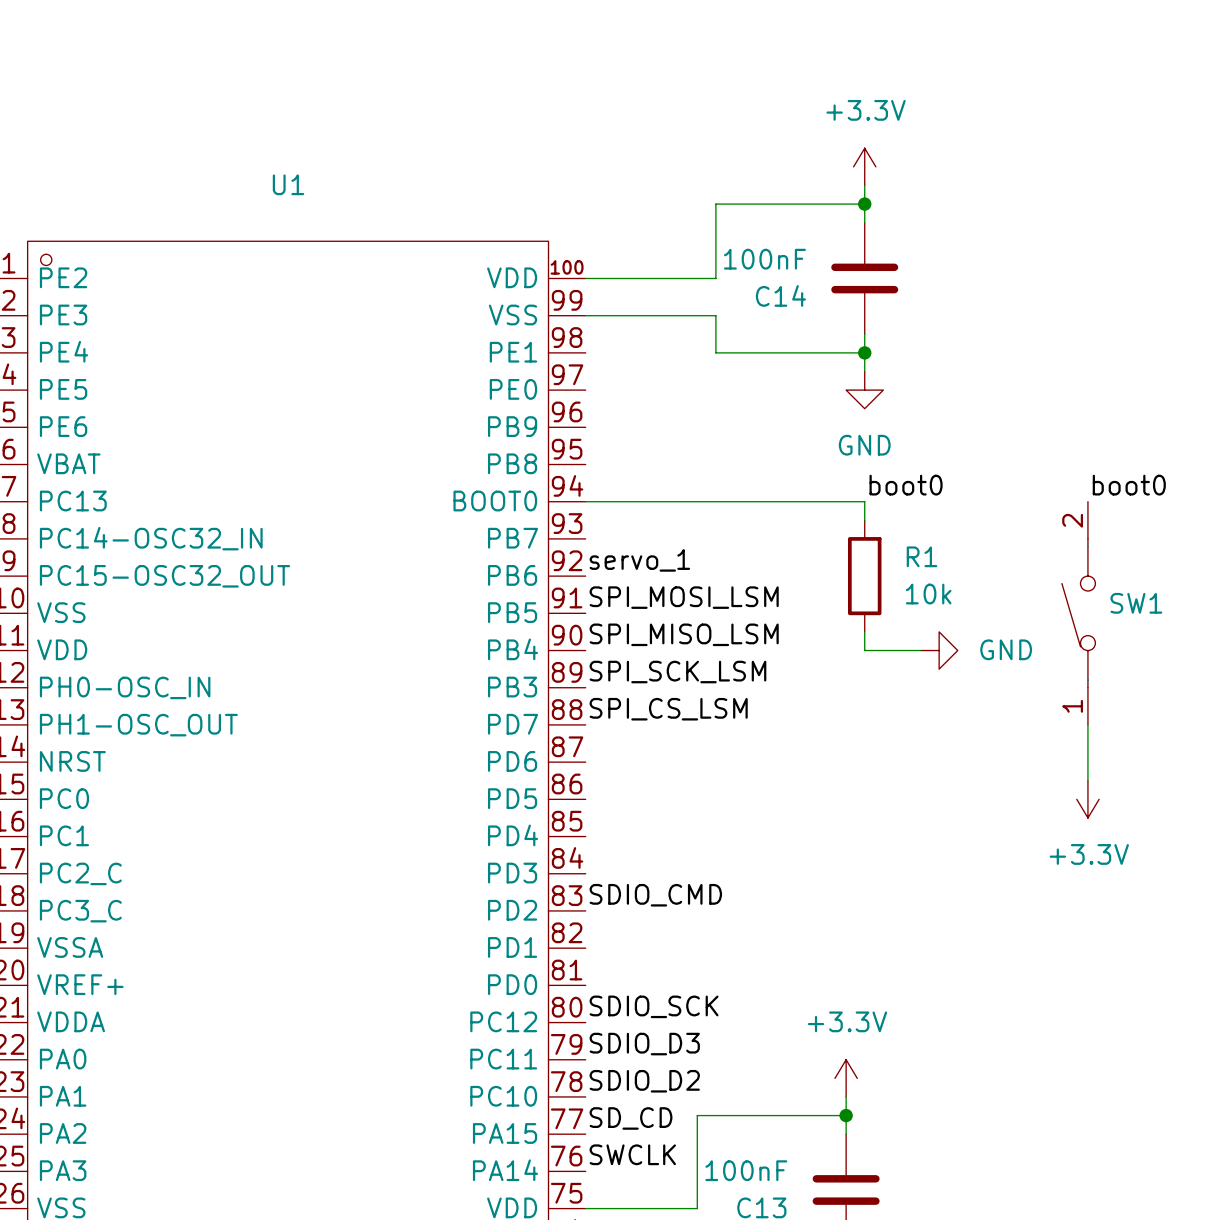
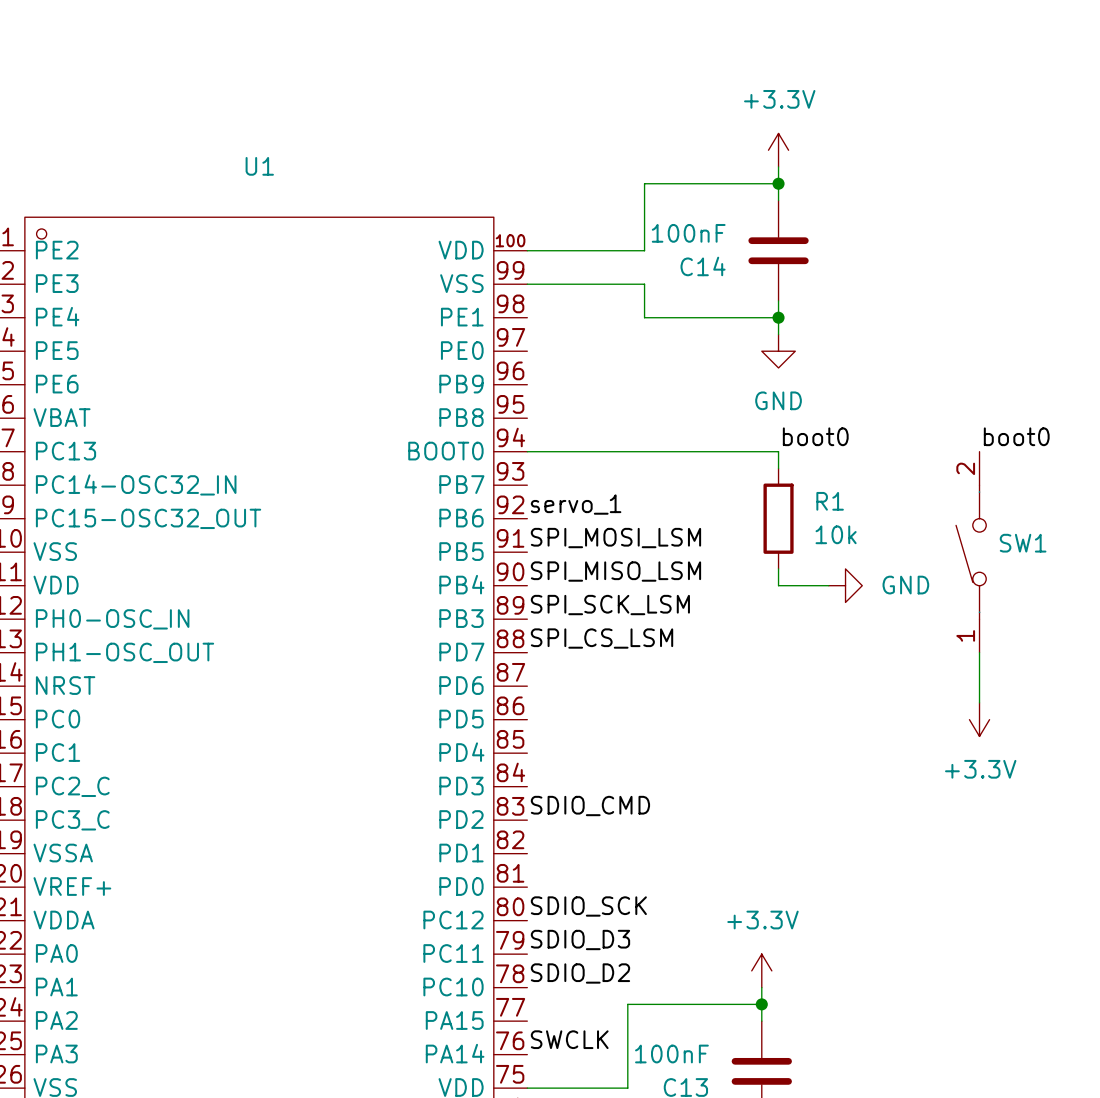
label: SD_CD (631, 1118) -> none

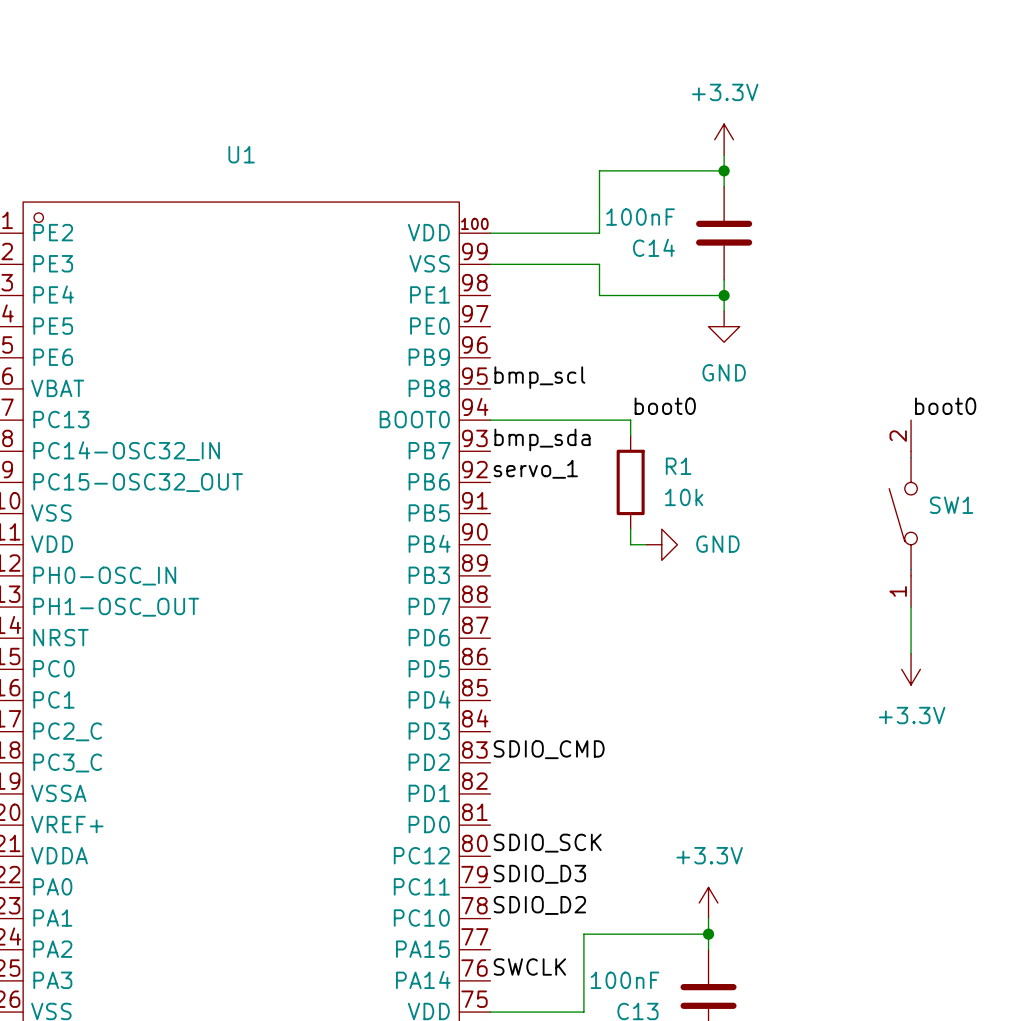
label: none -> bmp_scl (539, 377)
label position: boot0 (815, 436) -> boot0 (665, 406)
wire: (678, 451) (778, 451) (778, 468) -> (630, 420) (630, 435)
label: none -> bmp_sda (542, 439)
R1 position: (778, 518) -> (630, 482)
label: SPI_MOSI_LSM (615, 538) -> none
wire: none -> (630, 529) (630, 544) (646, 544)
wire: (778, 568) (778, 585) (828, 585) -> none
label: SPI_MISO_LSM (615, 571) -> none
power symbol position: GND (845, 585) -> GND (661, 544)
label: SPI_SCK_LSM (610, 605) -> none
label: SPI_CS_LSM (602, 638) -> none

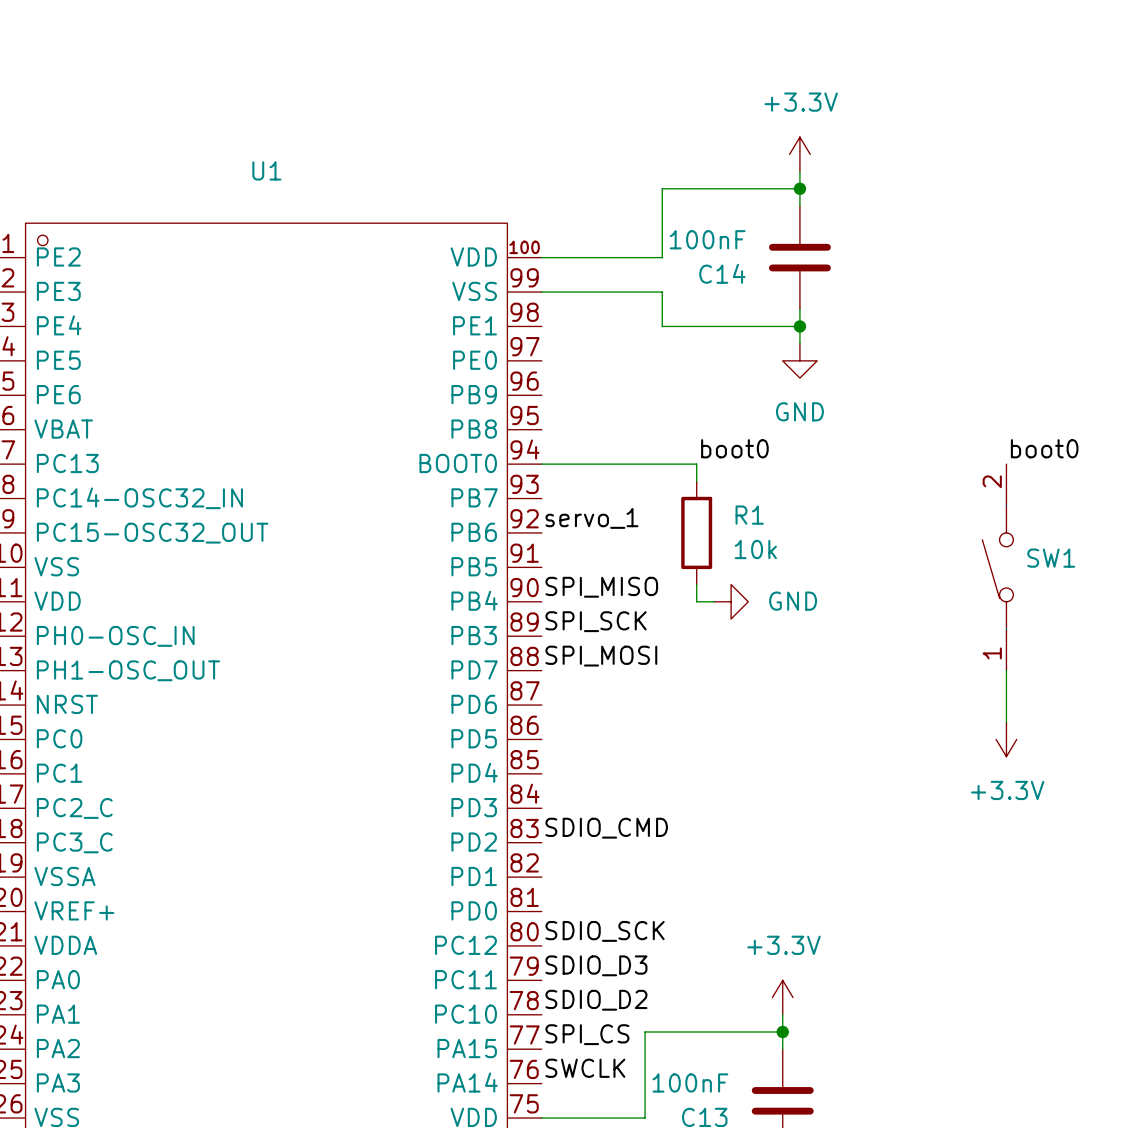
label: bmp_scl (539, 377) -> none
label: bmp_sda (542, 439) -> none
label: none -> SPI_MISO (601, 587)
label: none -> SPI_SCK (596, 621)
label: none -> SPI_MOSI (601, 656)
label: none -> SPI_CS (587, 1034)

